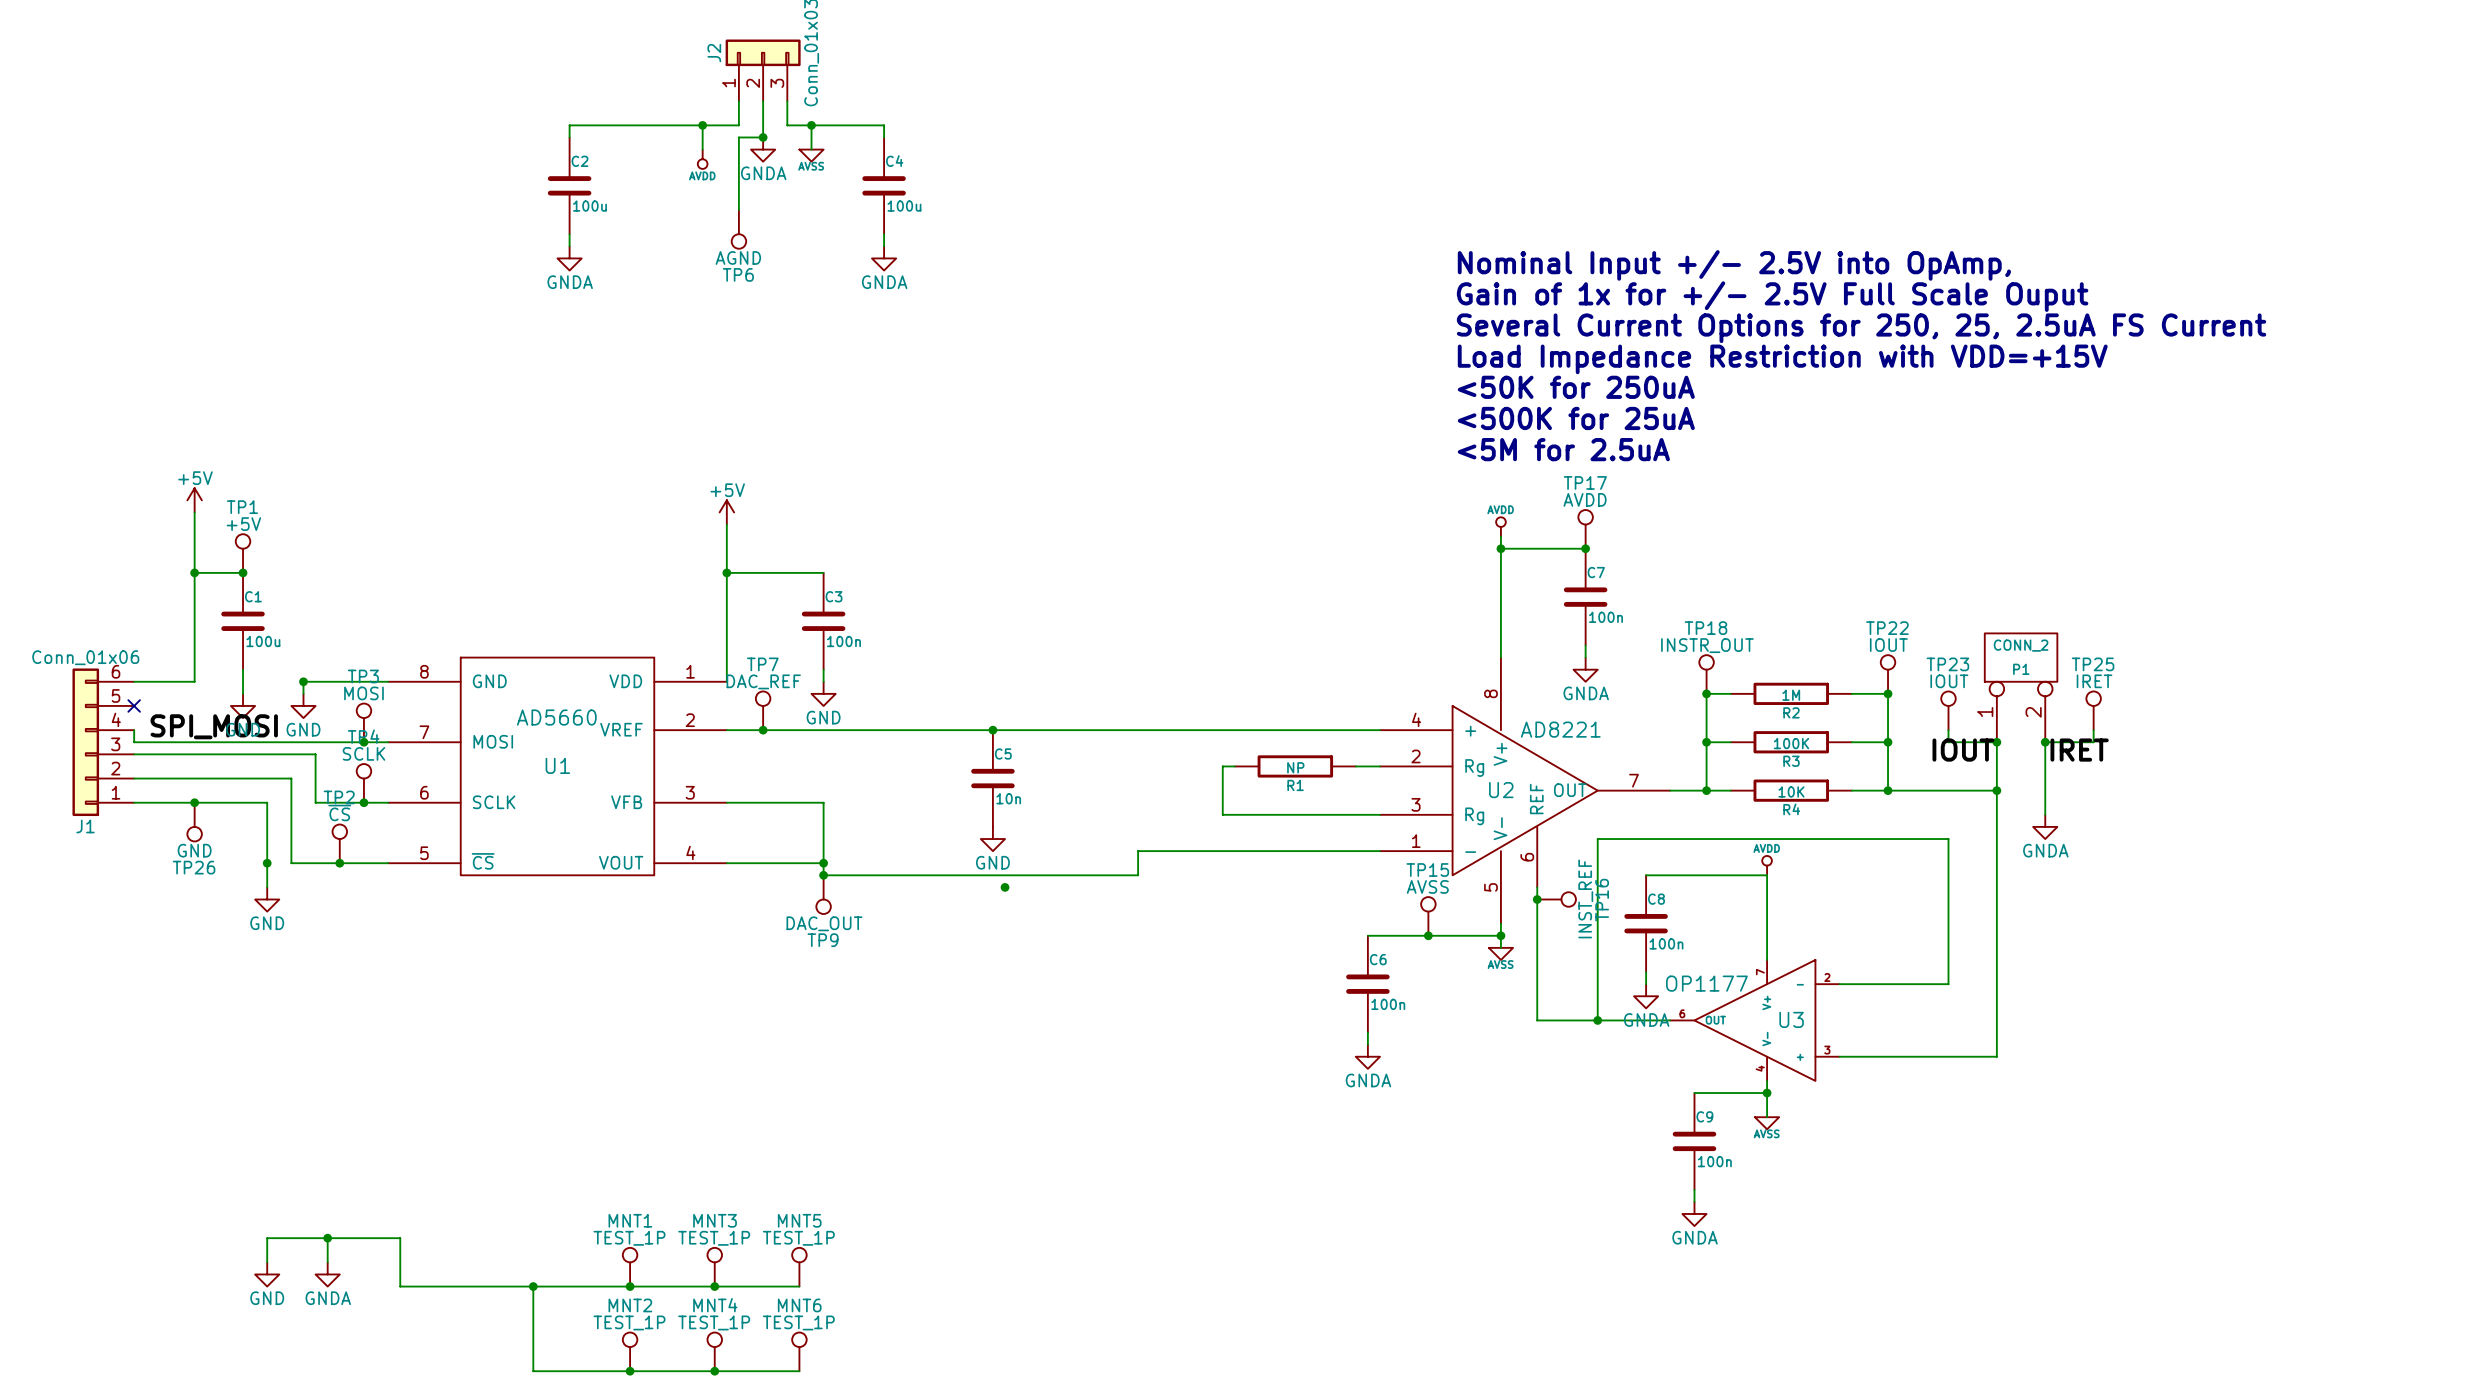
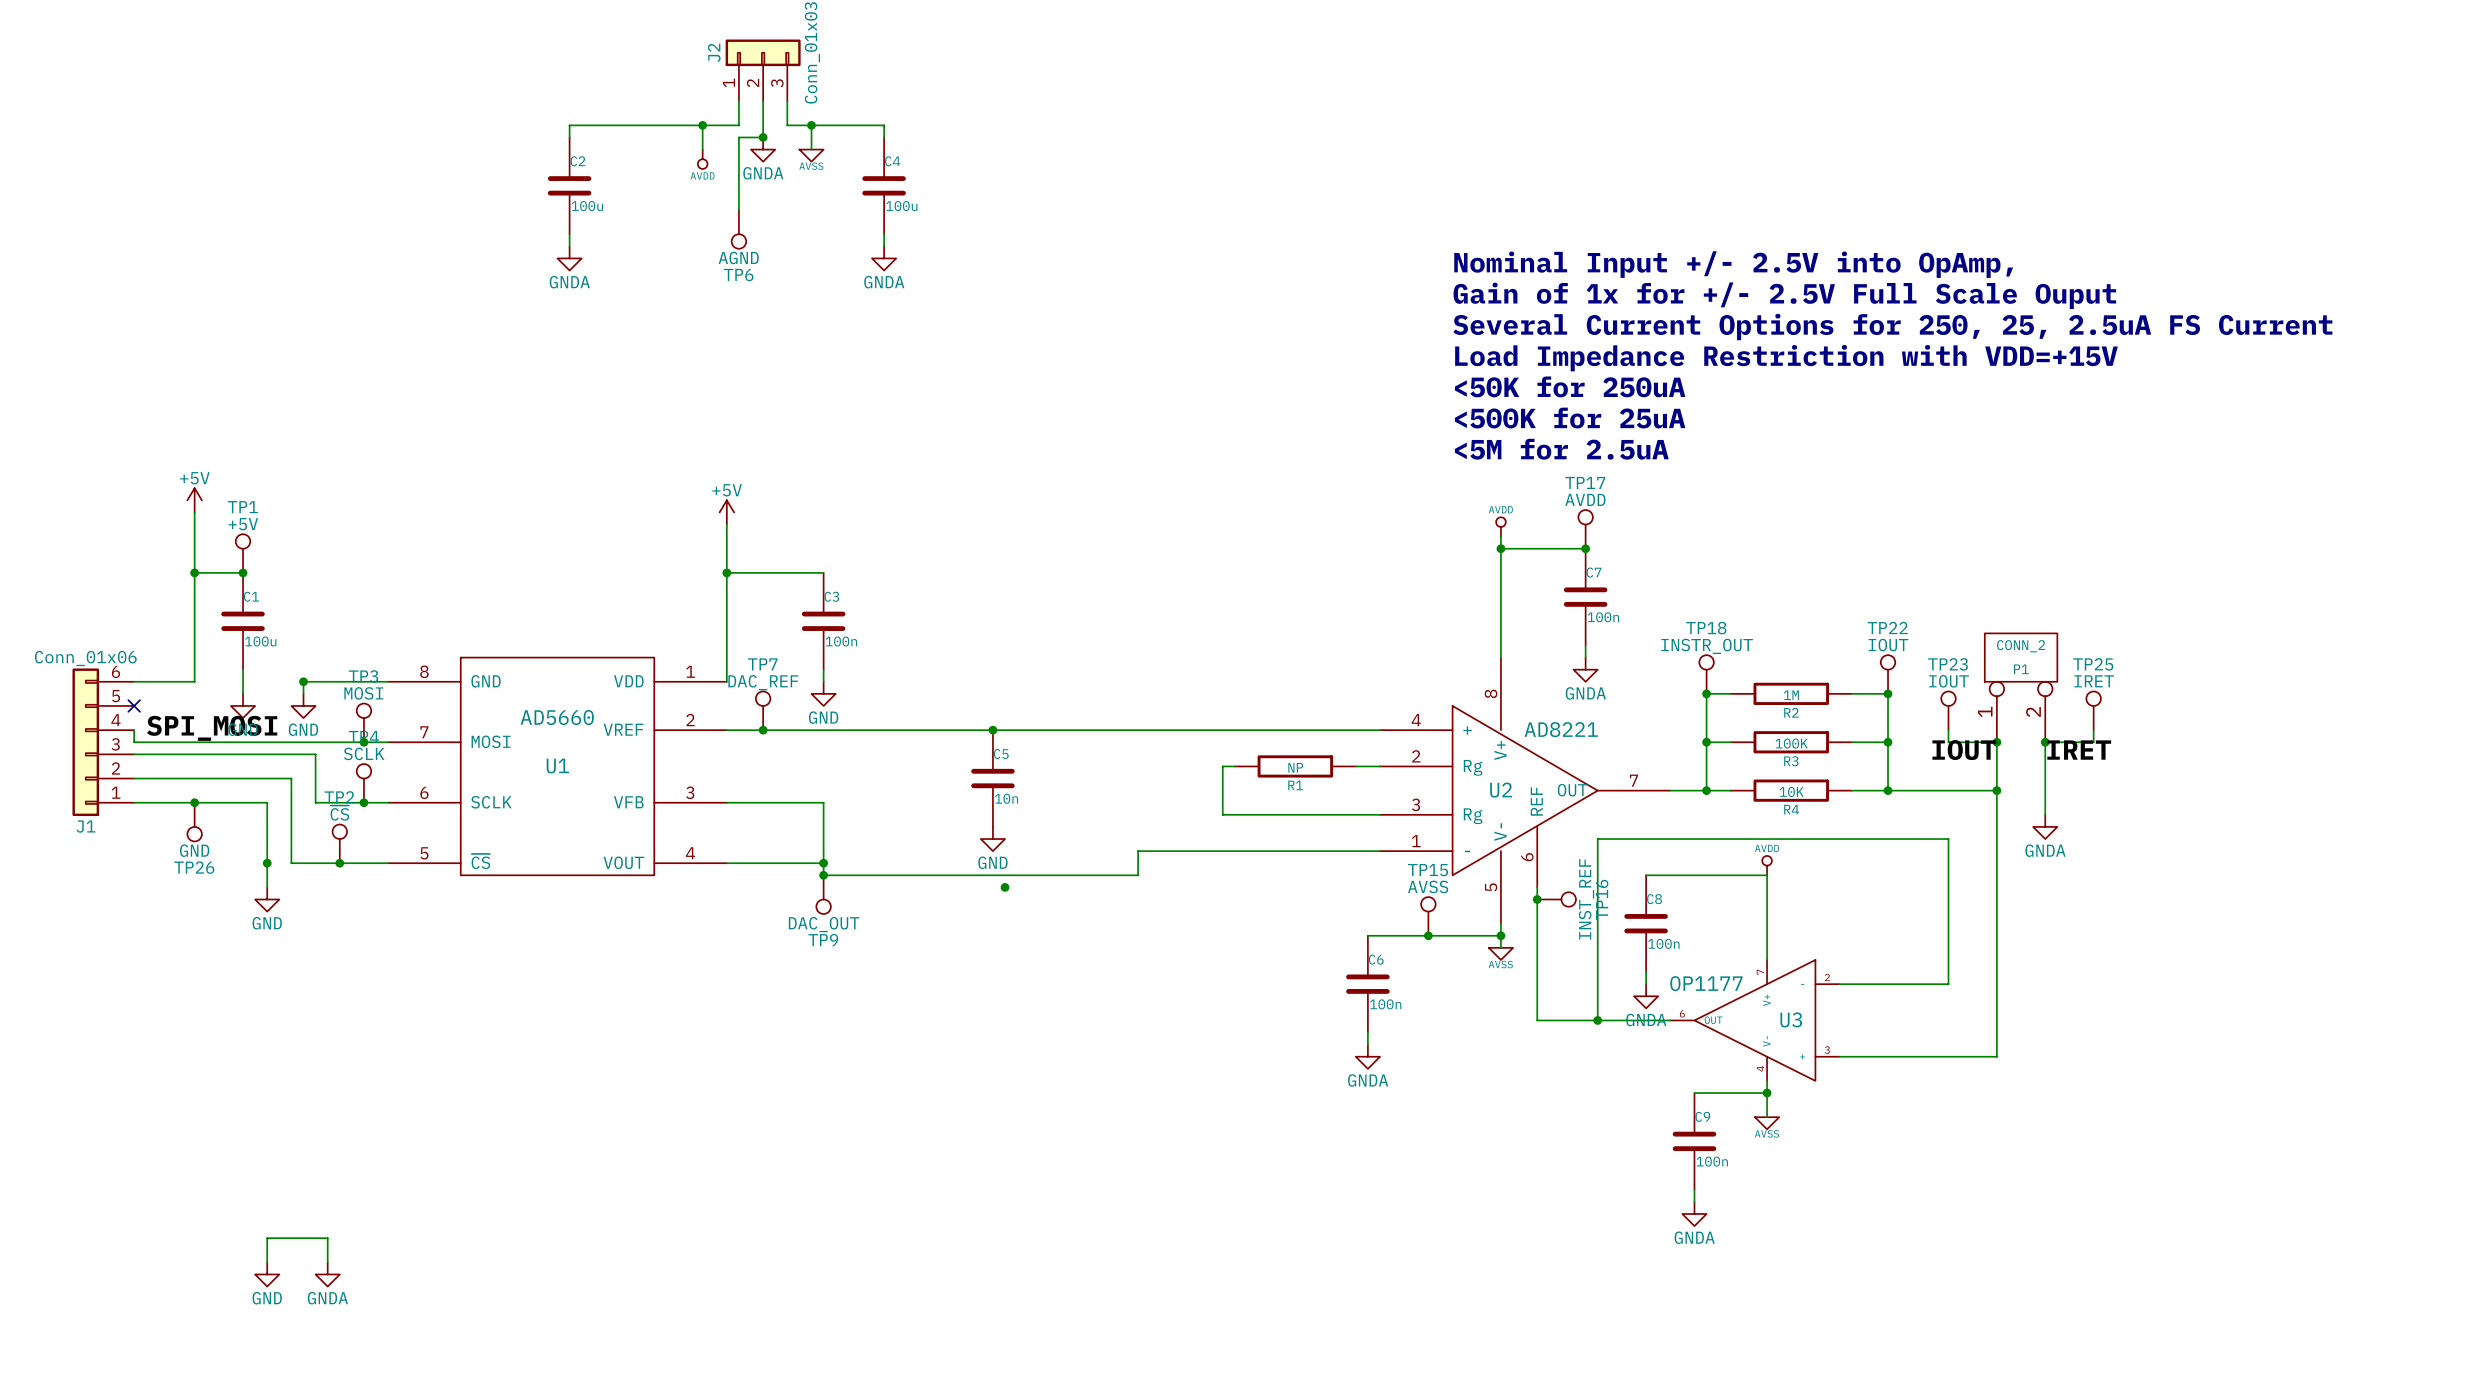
wire: (327, 1238) (400, 1238) (400, 1286) (799, 1286) -> none
junction: (327, 1238) -> none
MNT1: TEST_1P (630, 1267) -> none
MNT3: TEST_1P (714, 1267) -> none
MNT5: TEST_1P (799, 1267) -> none
wire: (533, 1286) (533, 1371) (799, 1371) -> none
junction: (533, 1286) -> none
junction: (630, 1286) -> none
junction: (714, 1286) -> none
MNT2: TEST_1P (630, 1351) -> none
MNT4: TEST_1P (714, 1351) -> none
MNT6: TEST_1P (799, 1351) -> none
junction: (630, 1371) -> none
junction: (714, 1371) -> none

